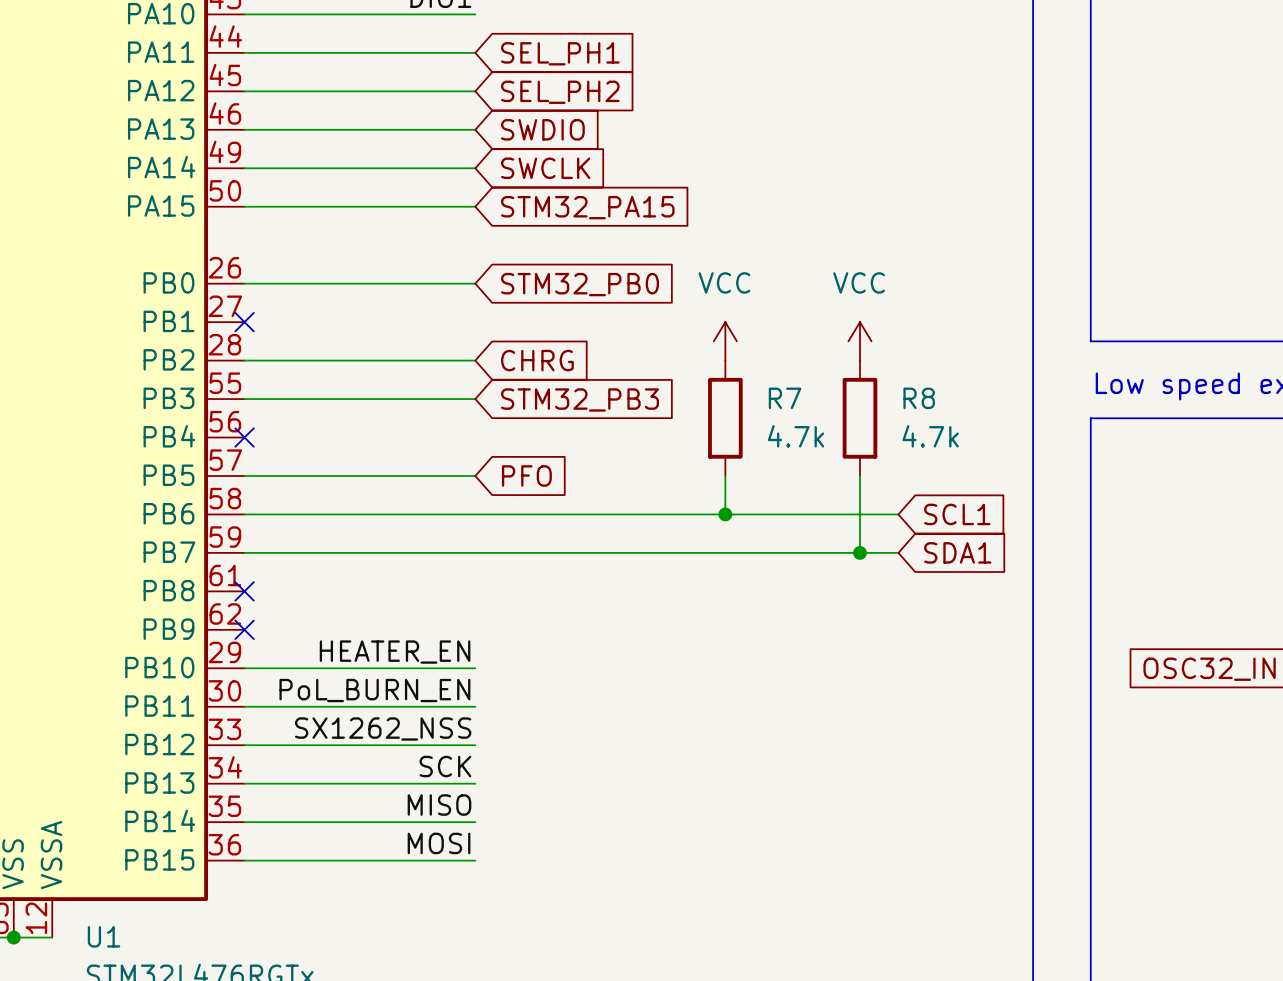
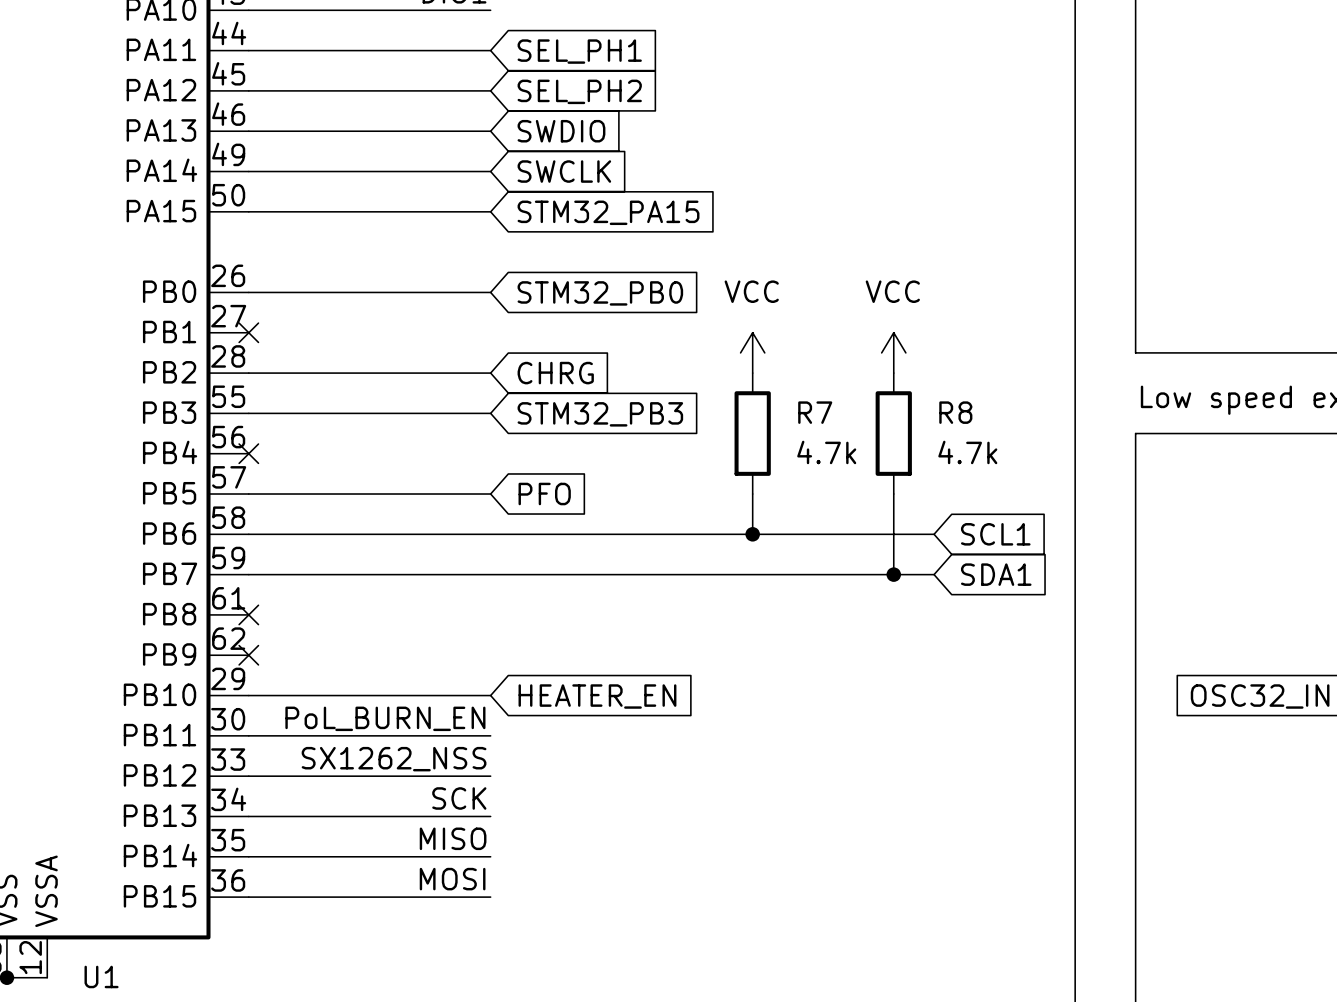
label: HEATER_EN (395, 652) -> none
global label: none -> HEATER_EN (597, 696)

